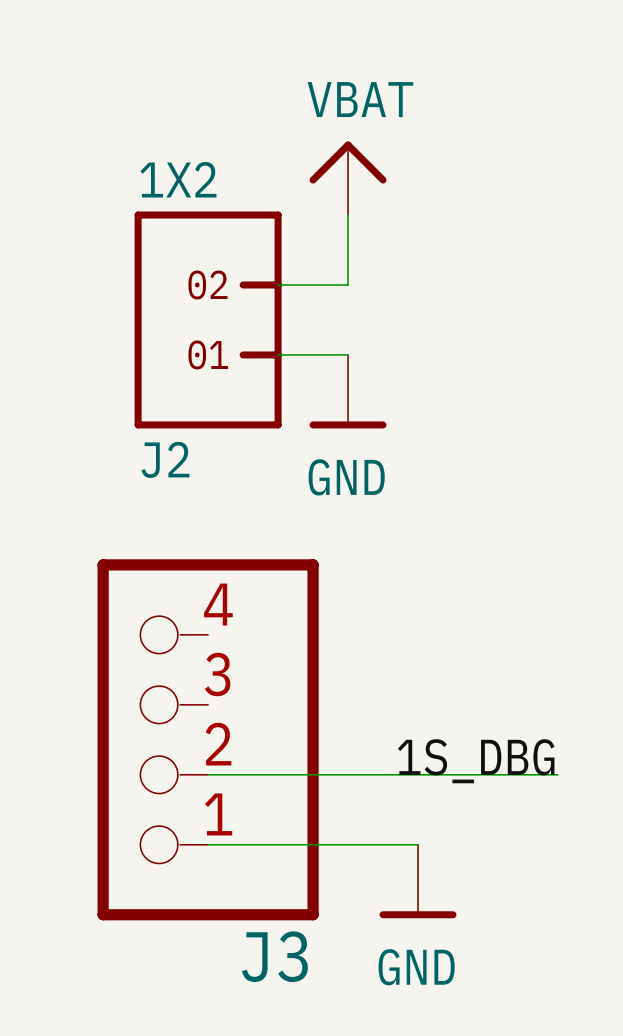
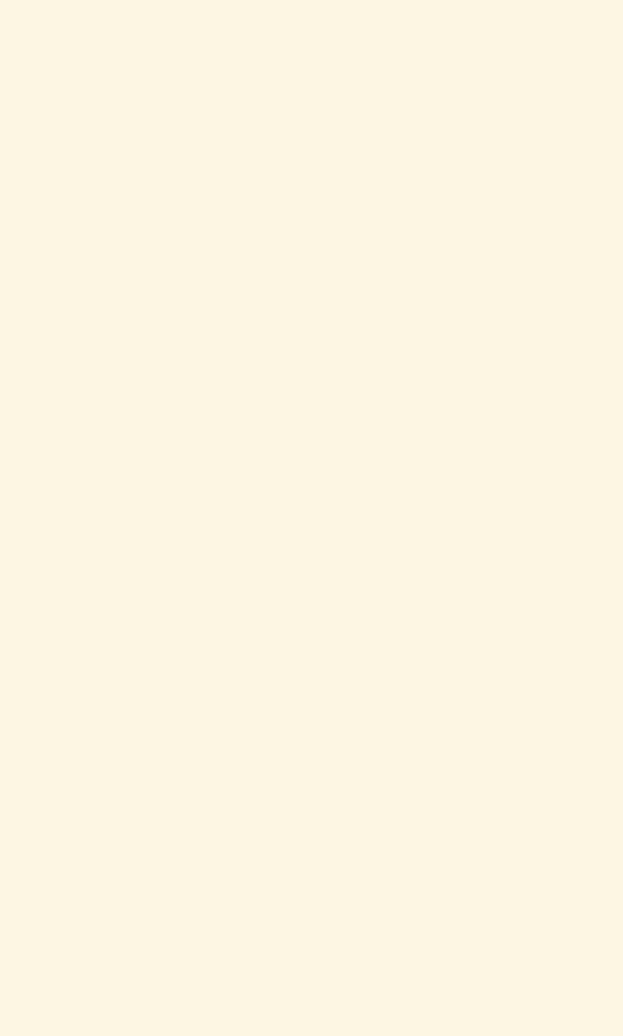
power symbol: VBAT (348, 178) -> none
wire: (348, 215) (348, 284) (278, 284) -> none
J2: 1X2 (208, 319) -> none
wire: (278, 354) (348, 354) -> none
power symbol: GND (348, 391) -> none
J3: (208, 739) -> none
label: 1S_DBG (476, 761) -> none
wire: (208, 774) (557, 774) -> none
wire: (208, 844) (418, 844) -> none
power symbol: GND (418, 881) -> none

